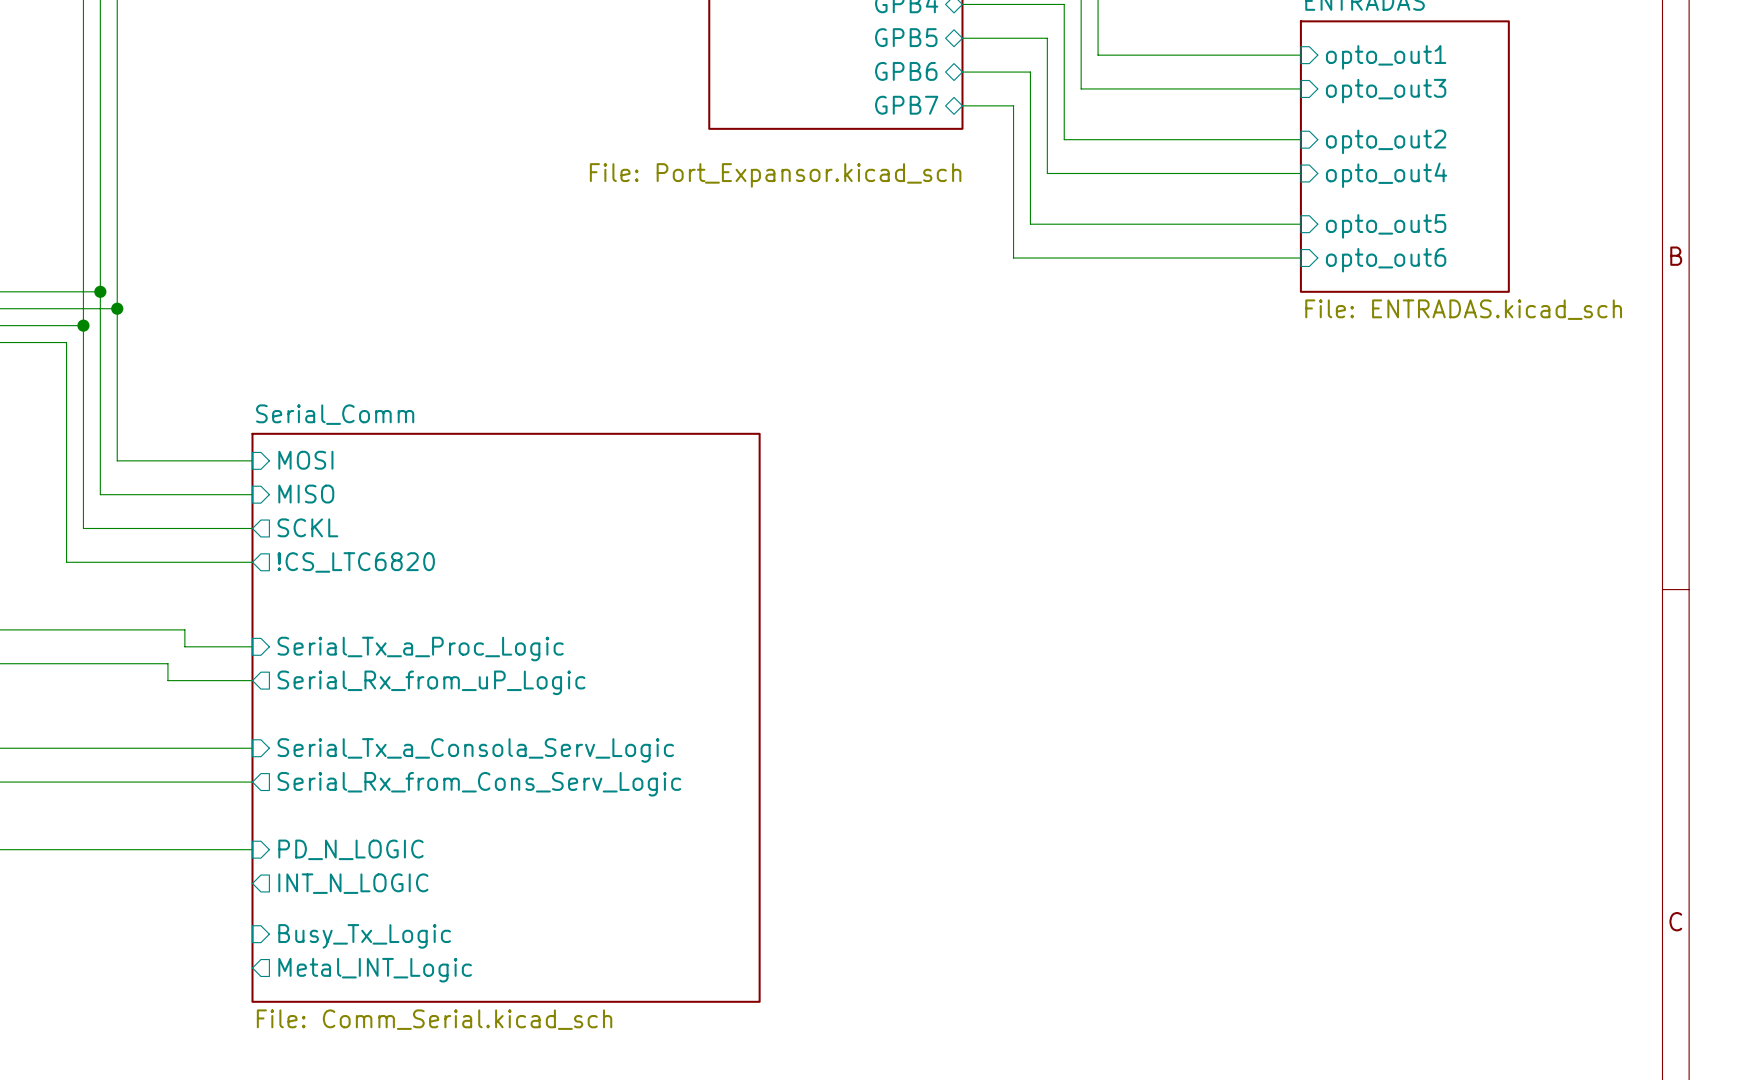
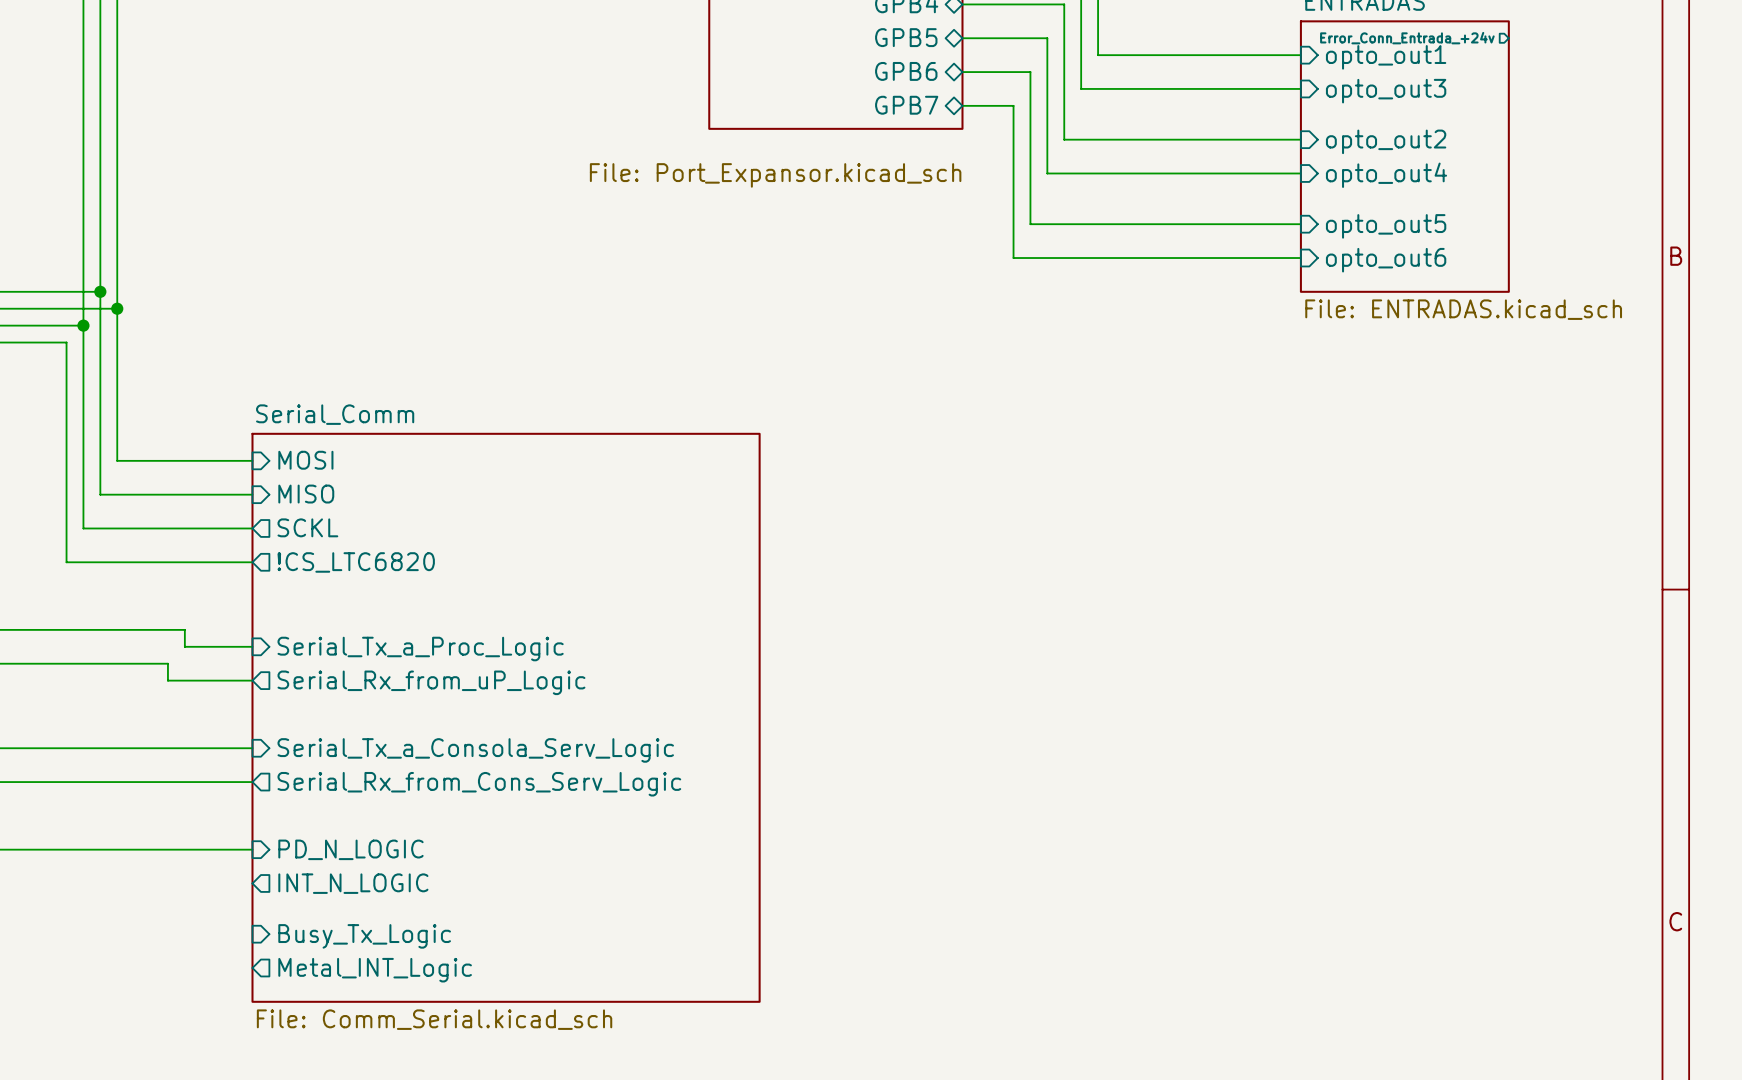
sheet pin: none -> Error_Conn_Entrada_+24v (1407, 38)

